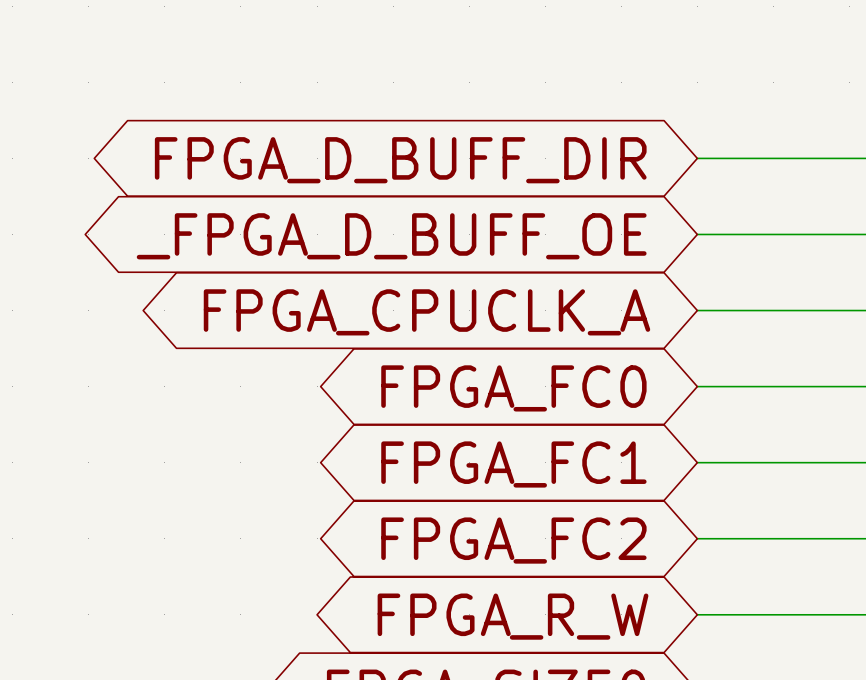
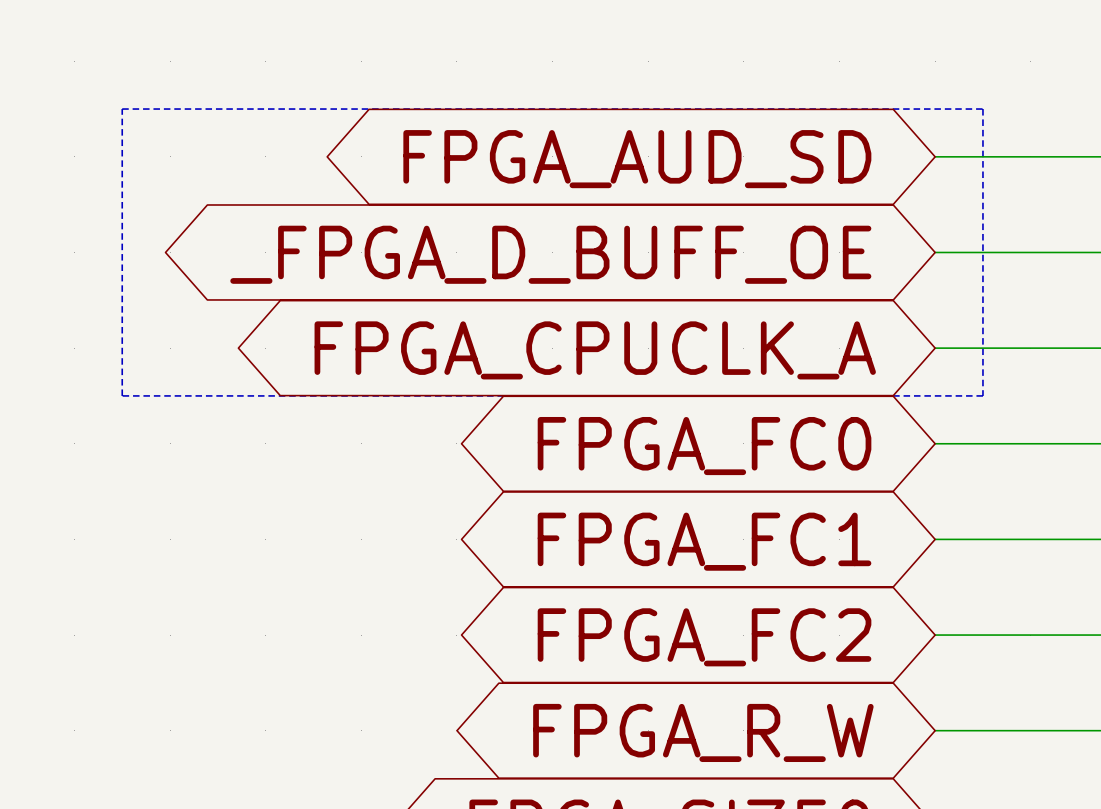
line: none -> (122, 109) (122, 395) (982, 395) (982, 109) (122, 109)
global label: FPGA_D_BUFF_DIR (400, 160) -> FPGA_AUD_SD (637, 159)

